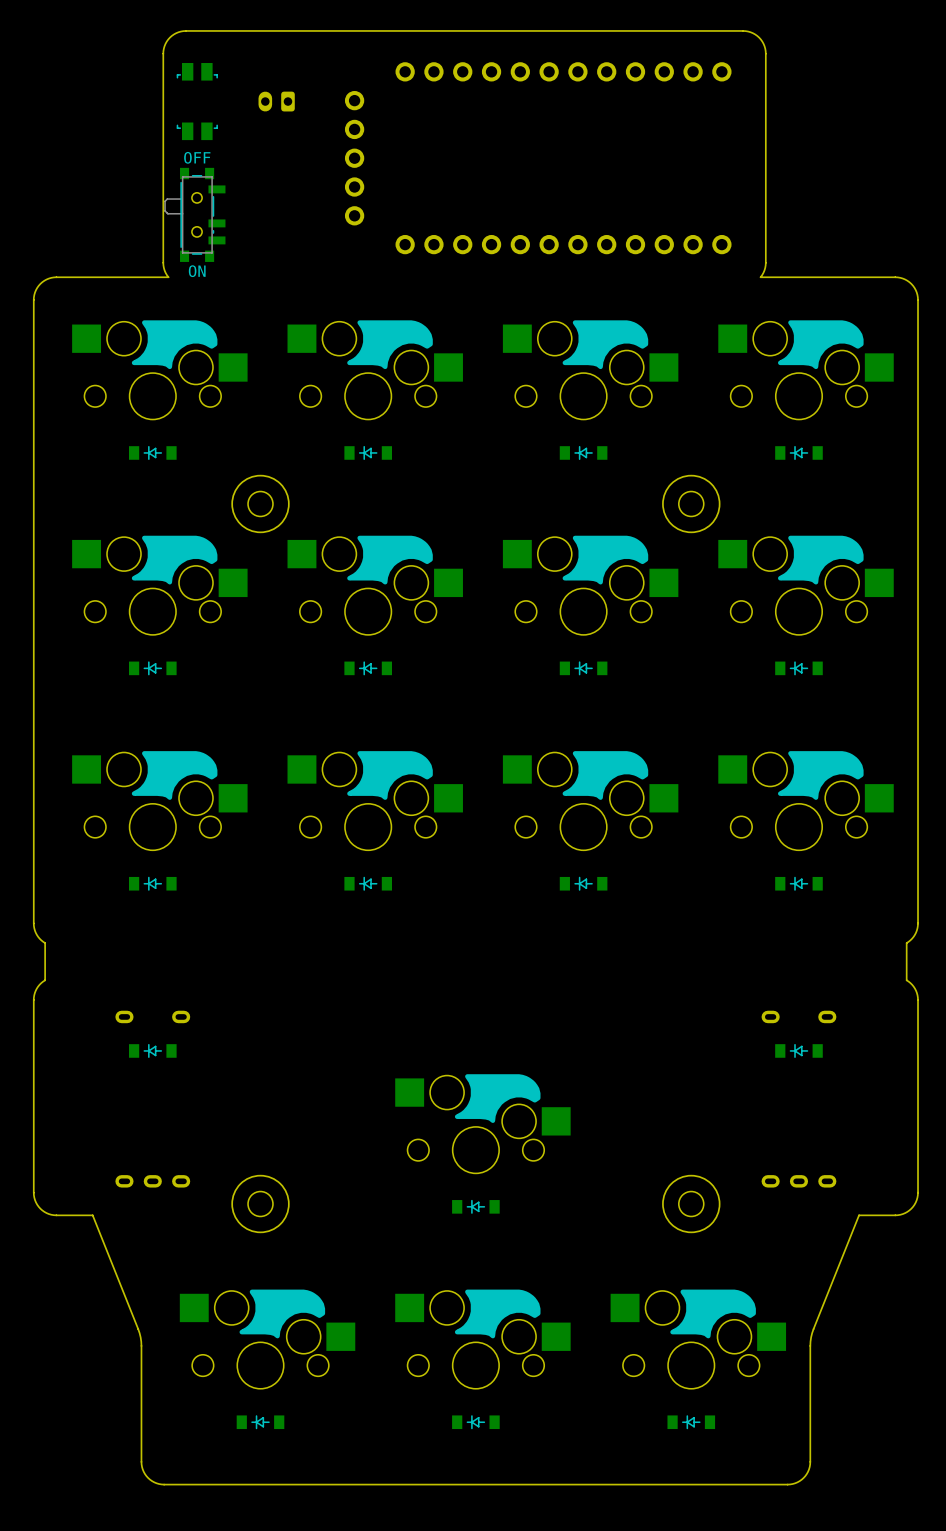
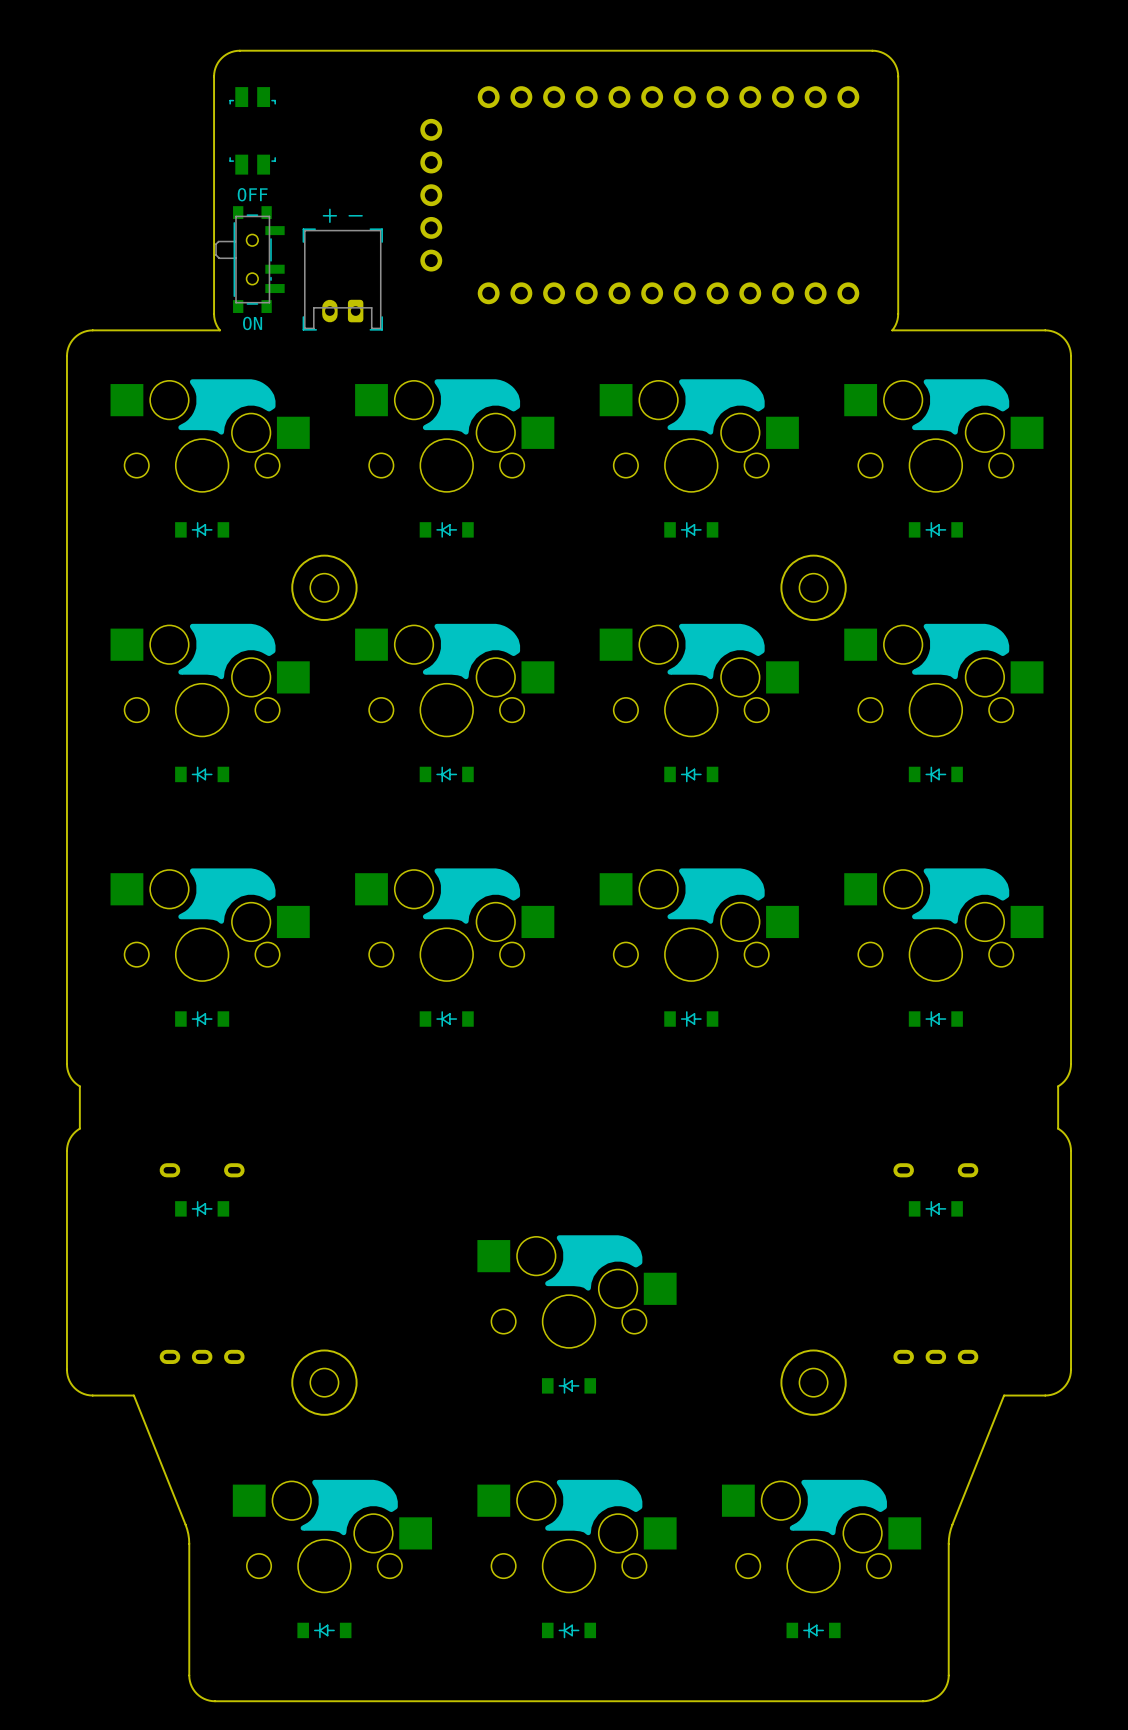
part: (276, 101) -> none
part: none -> (342, 269)

